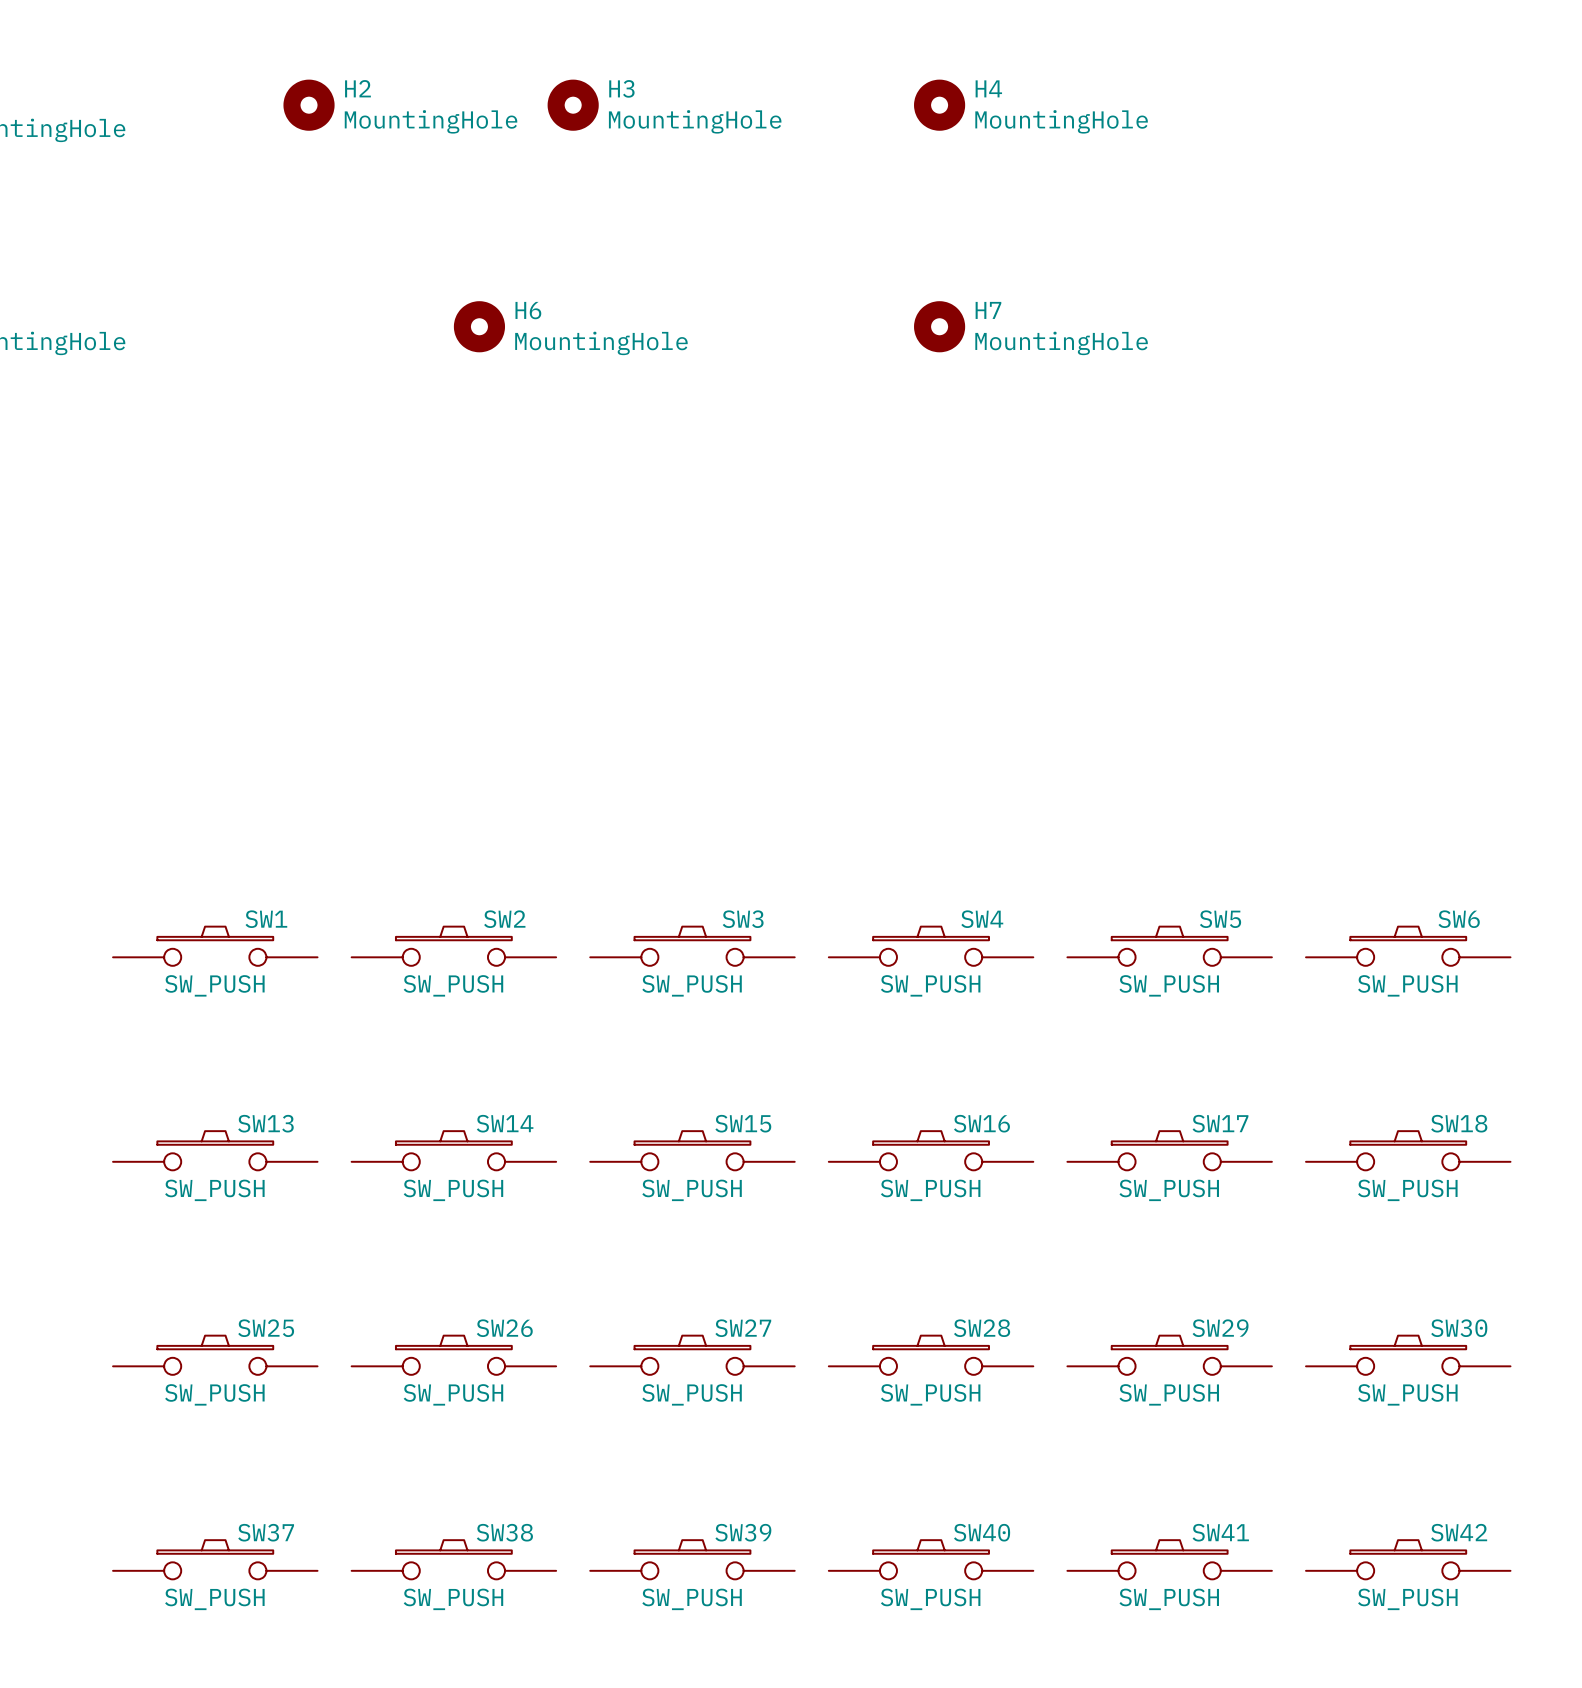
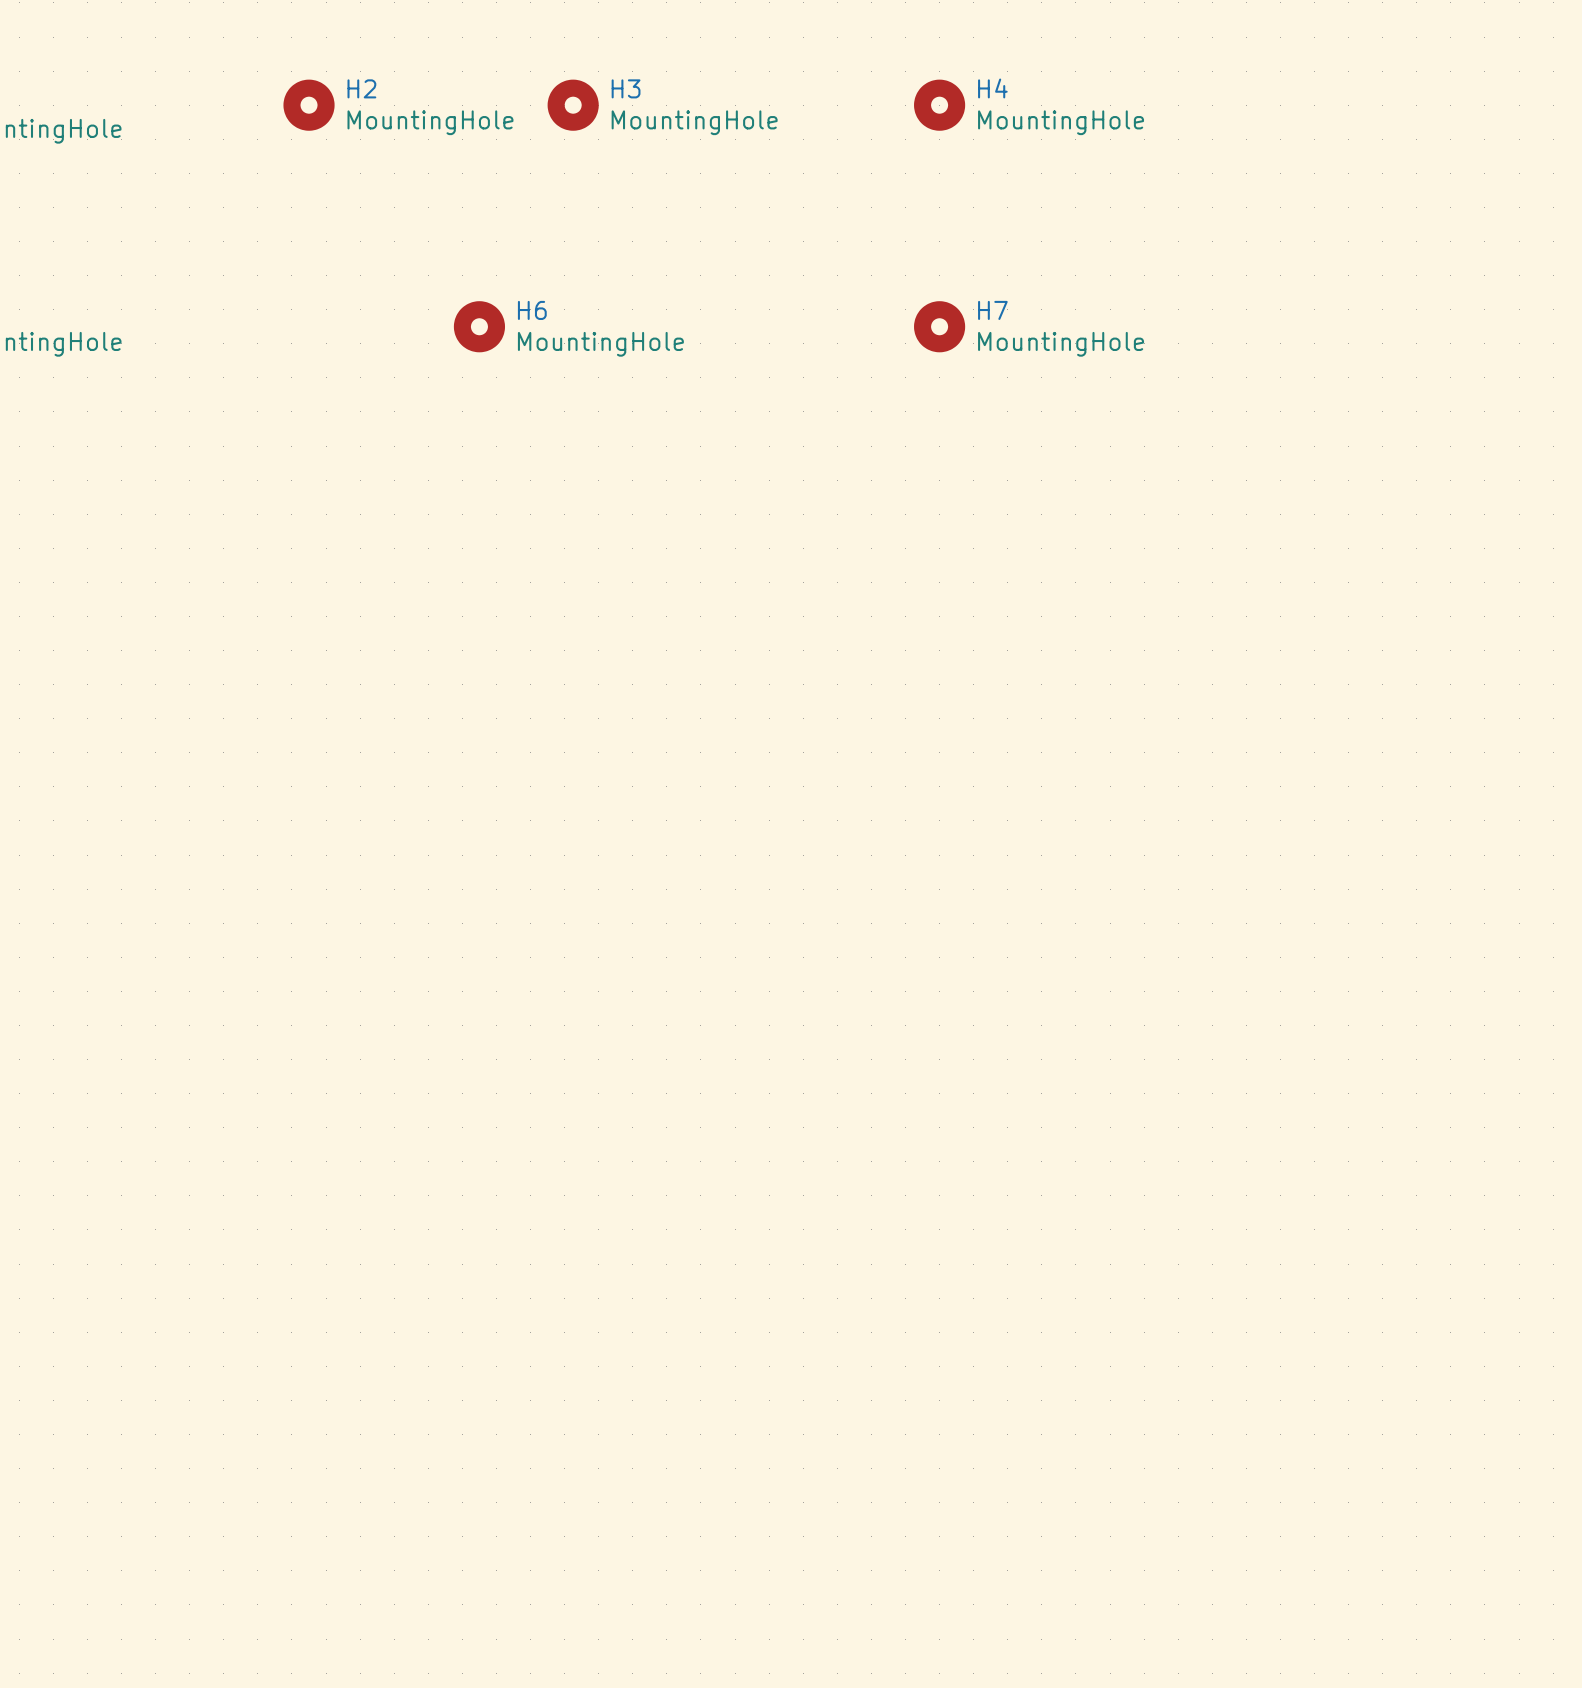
SW1: SW_PUSH (215, 946) -> none
SW2: SW_PUSH (453, 946) -> none
SW3: SW_PUSH (692, 946) -> none
SW4: SW_PUSH (931, 946) -> none
SW5: SW_PUSH (1169, 946) -> none
SW6: SW_PUSH (1408, 946) -> none
SW13: SW_PUSH (215, 1150) -> none
SW14: SW_PUSH (453, 1150) -> none
SW15: SW_PUSH (692, 1150) -> none
SW16: SW_PUSH (931, 1150) -> none
SW17: SW_PUSH (1169, 1150) -> none
SW18: SW_PUSH (1408, 1150) -> none
SW25: SW_PUSH (215, 1355) -> none
SW26: SW_PUSH (453, 1355) -> none
SW27: SW_PUSH (692, 1355) -> none
SW28: SW_PUSH (931, 1355) -> none
SW29: SW_PUSH (1169, 1355) -> none
SW30: SW_PUSH (1408, 1355) -> none
SW37: SW_PUSH (215, 1559) -> none
SW38: SW_PUSH (453, 1559) -> none
SW39: SW_PUSH (692, 1559) -> none
SW40: SW_PUSH (931, 1559) -> none
SW41: SW_PUSH (1169, 1559) -> none
SW42: SW_PUSH (1408, 1559) -> none

